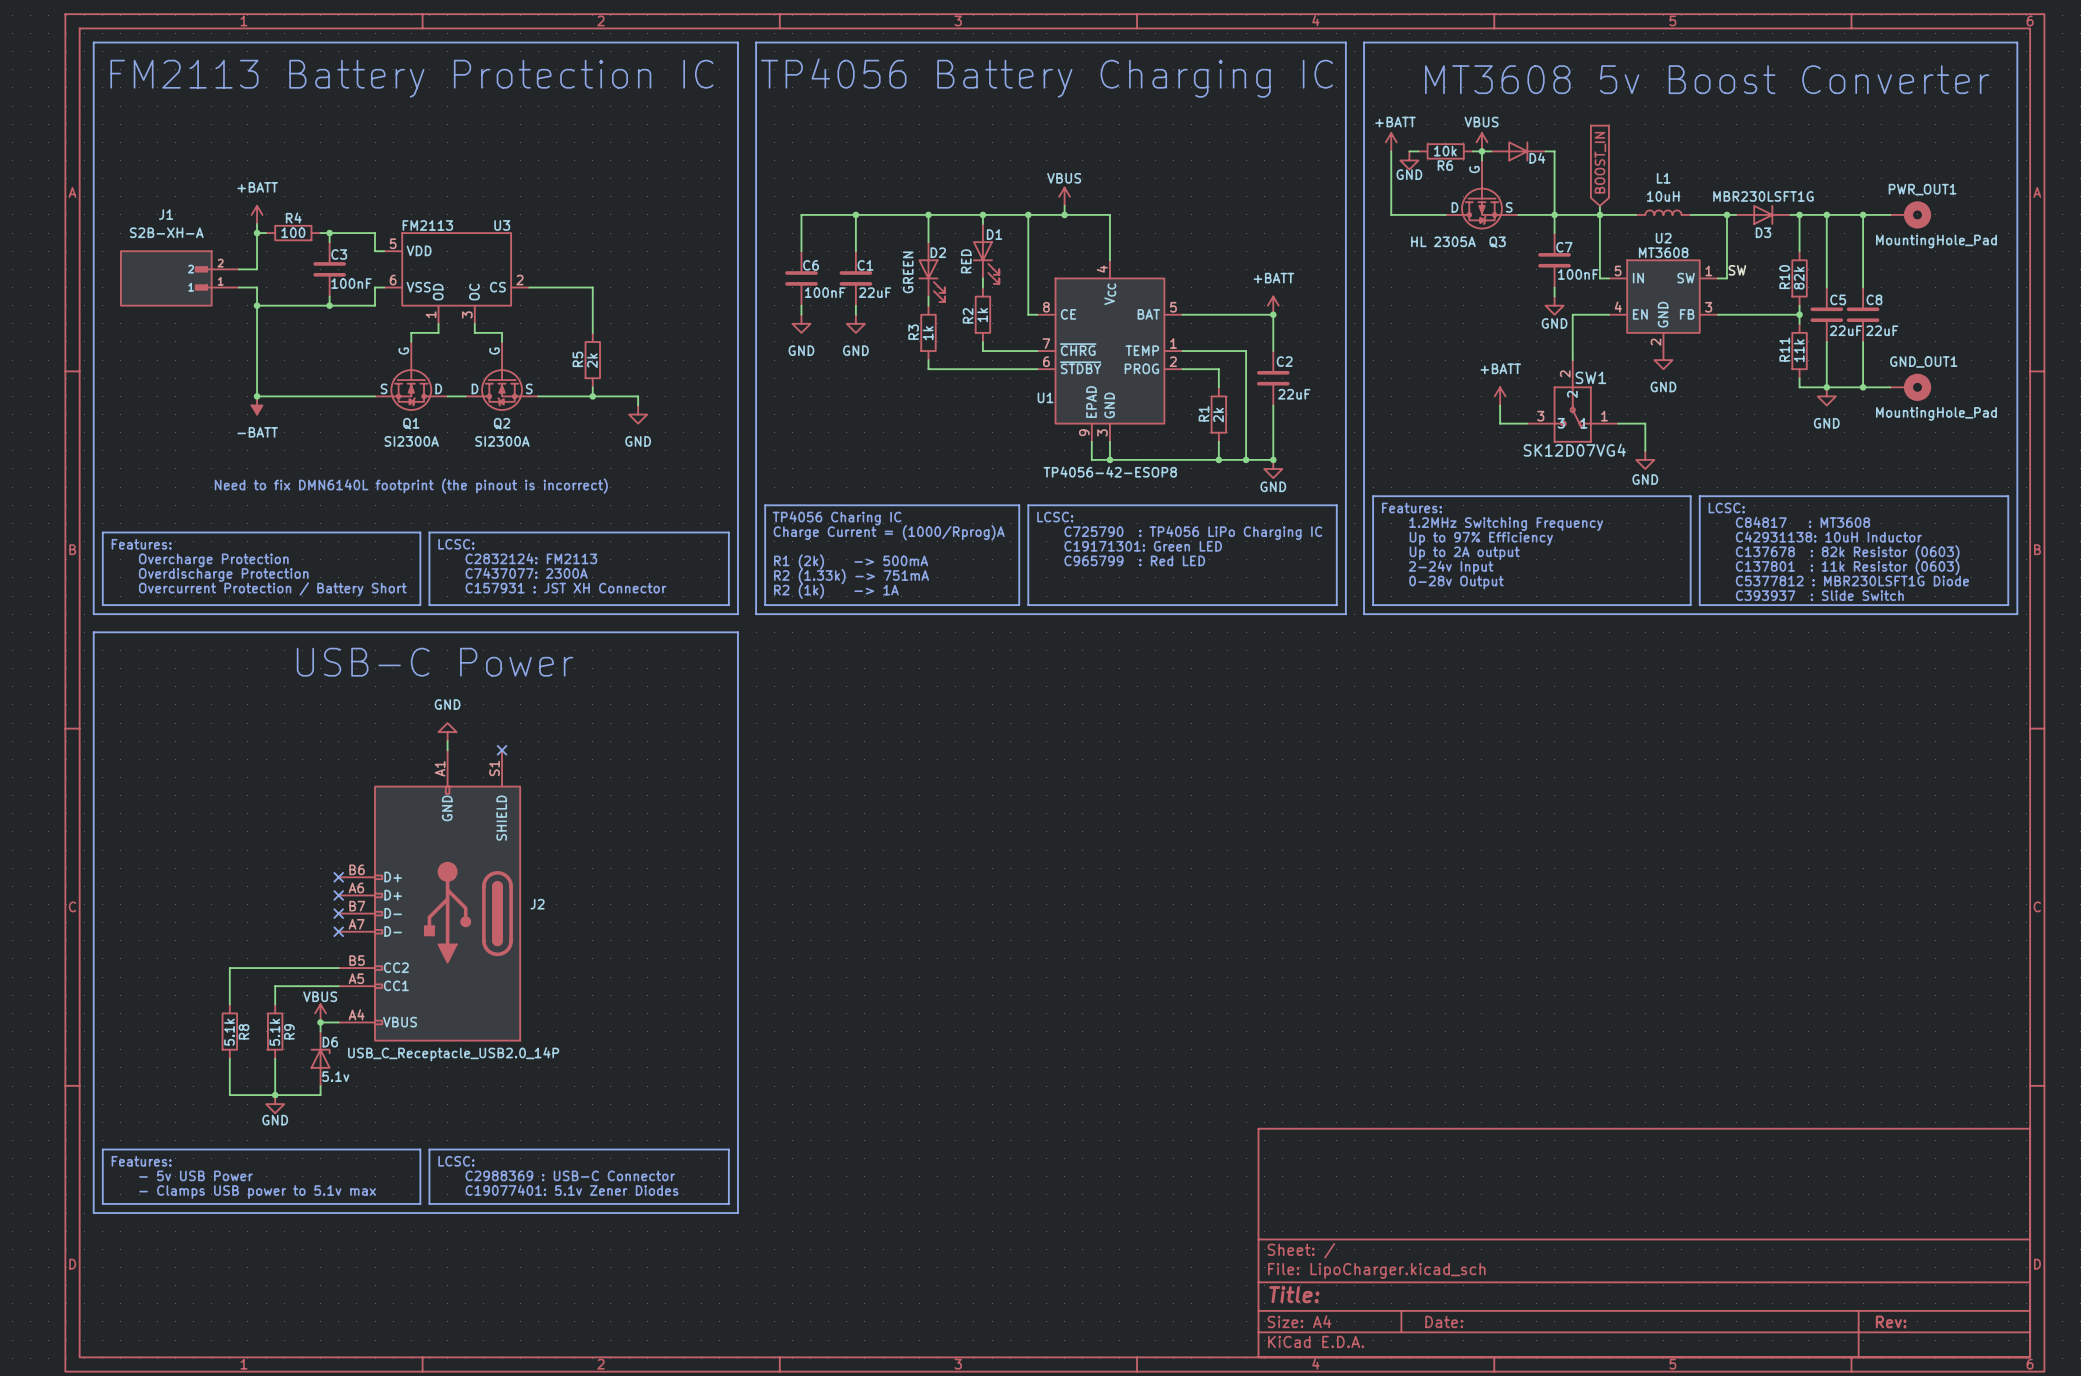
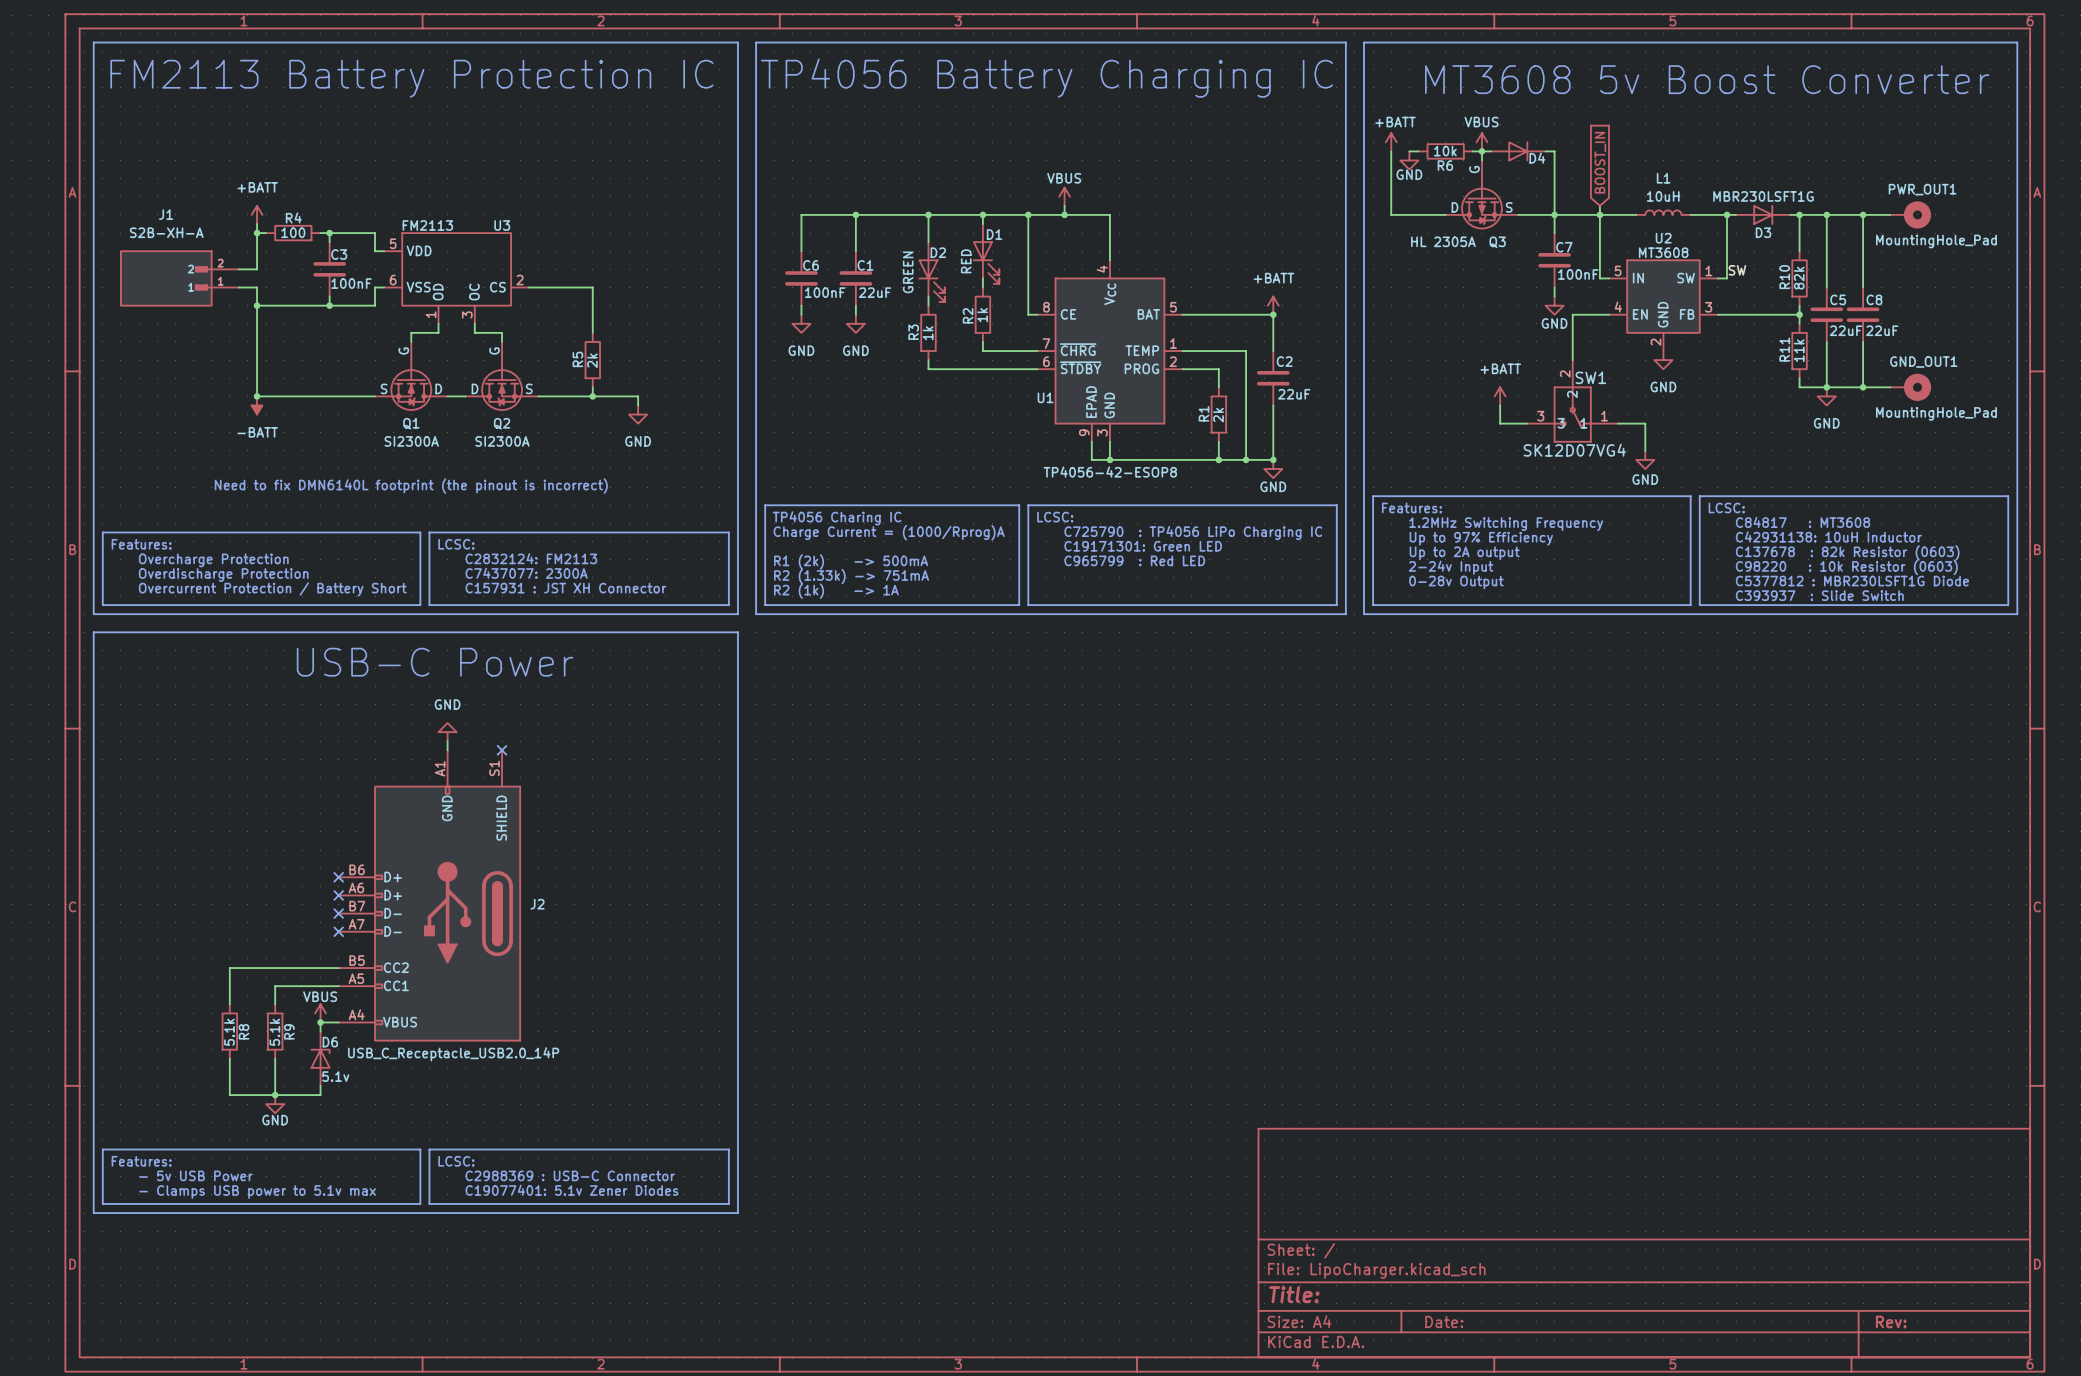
text: C137801 : 11k Resistor (0603) (1847, 567) -> C98220 : 10k Resistor (0603) (1846, 567)

